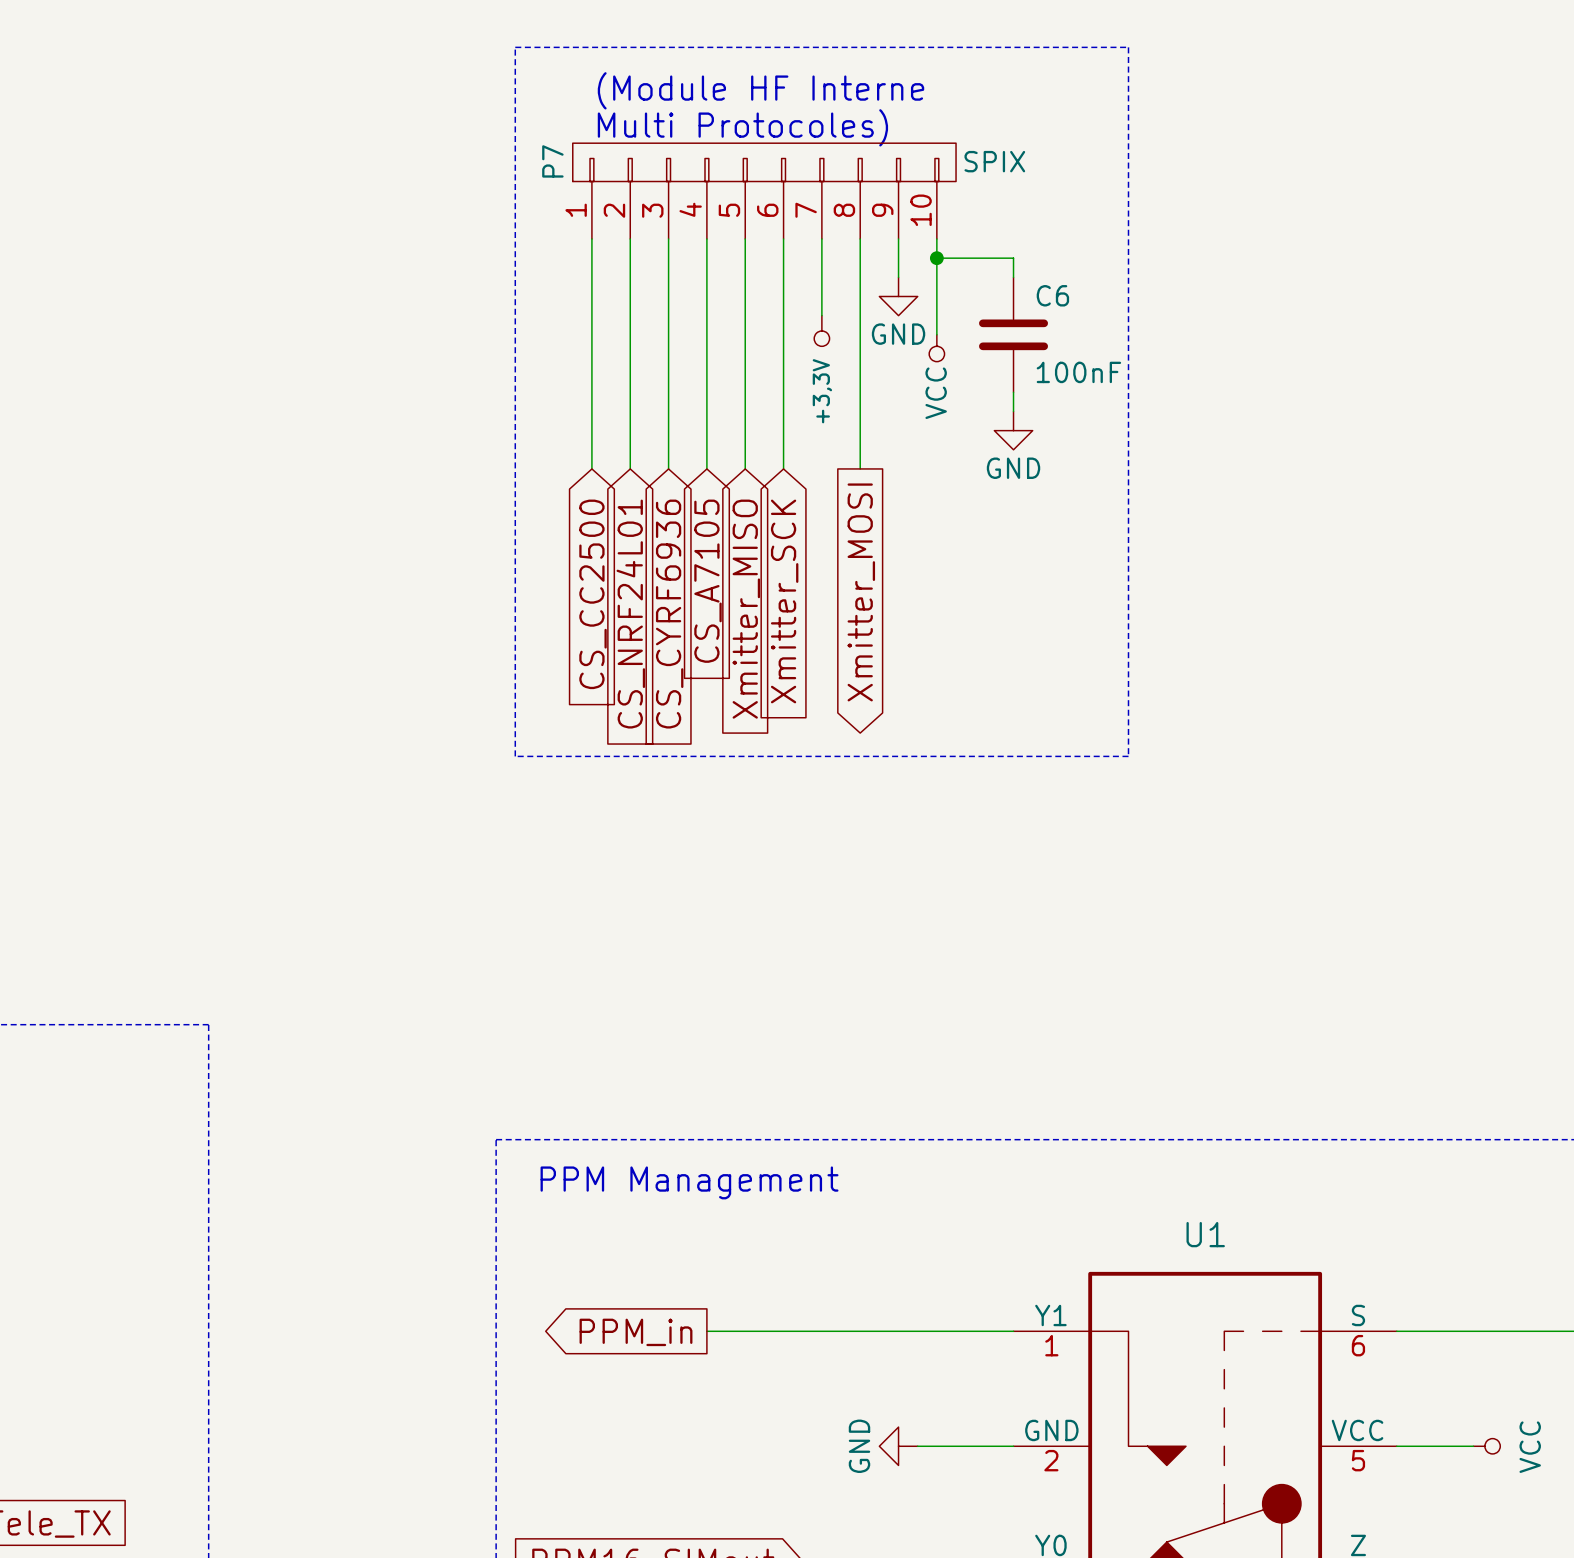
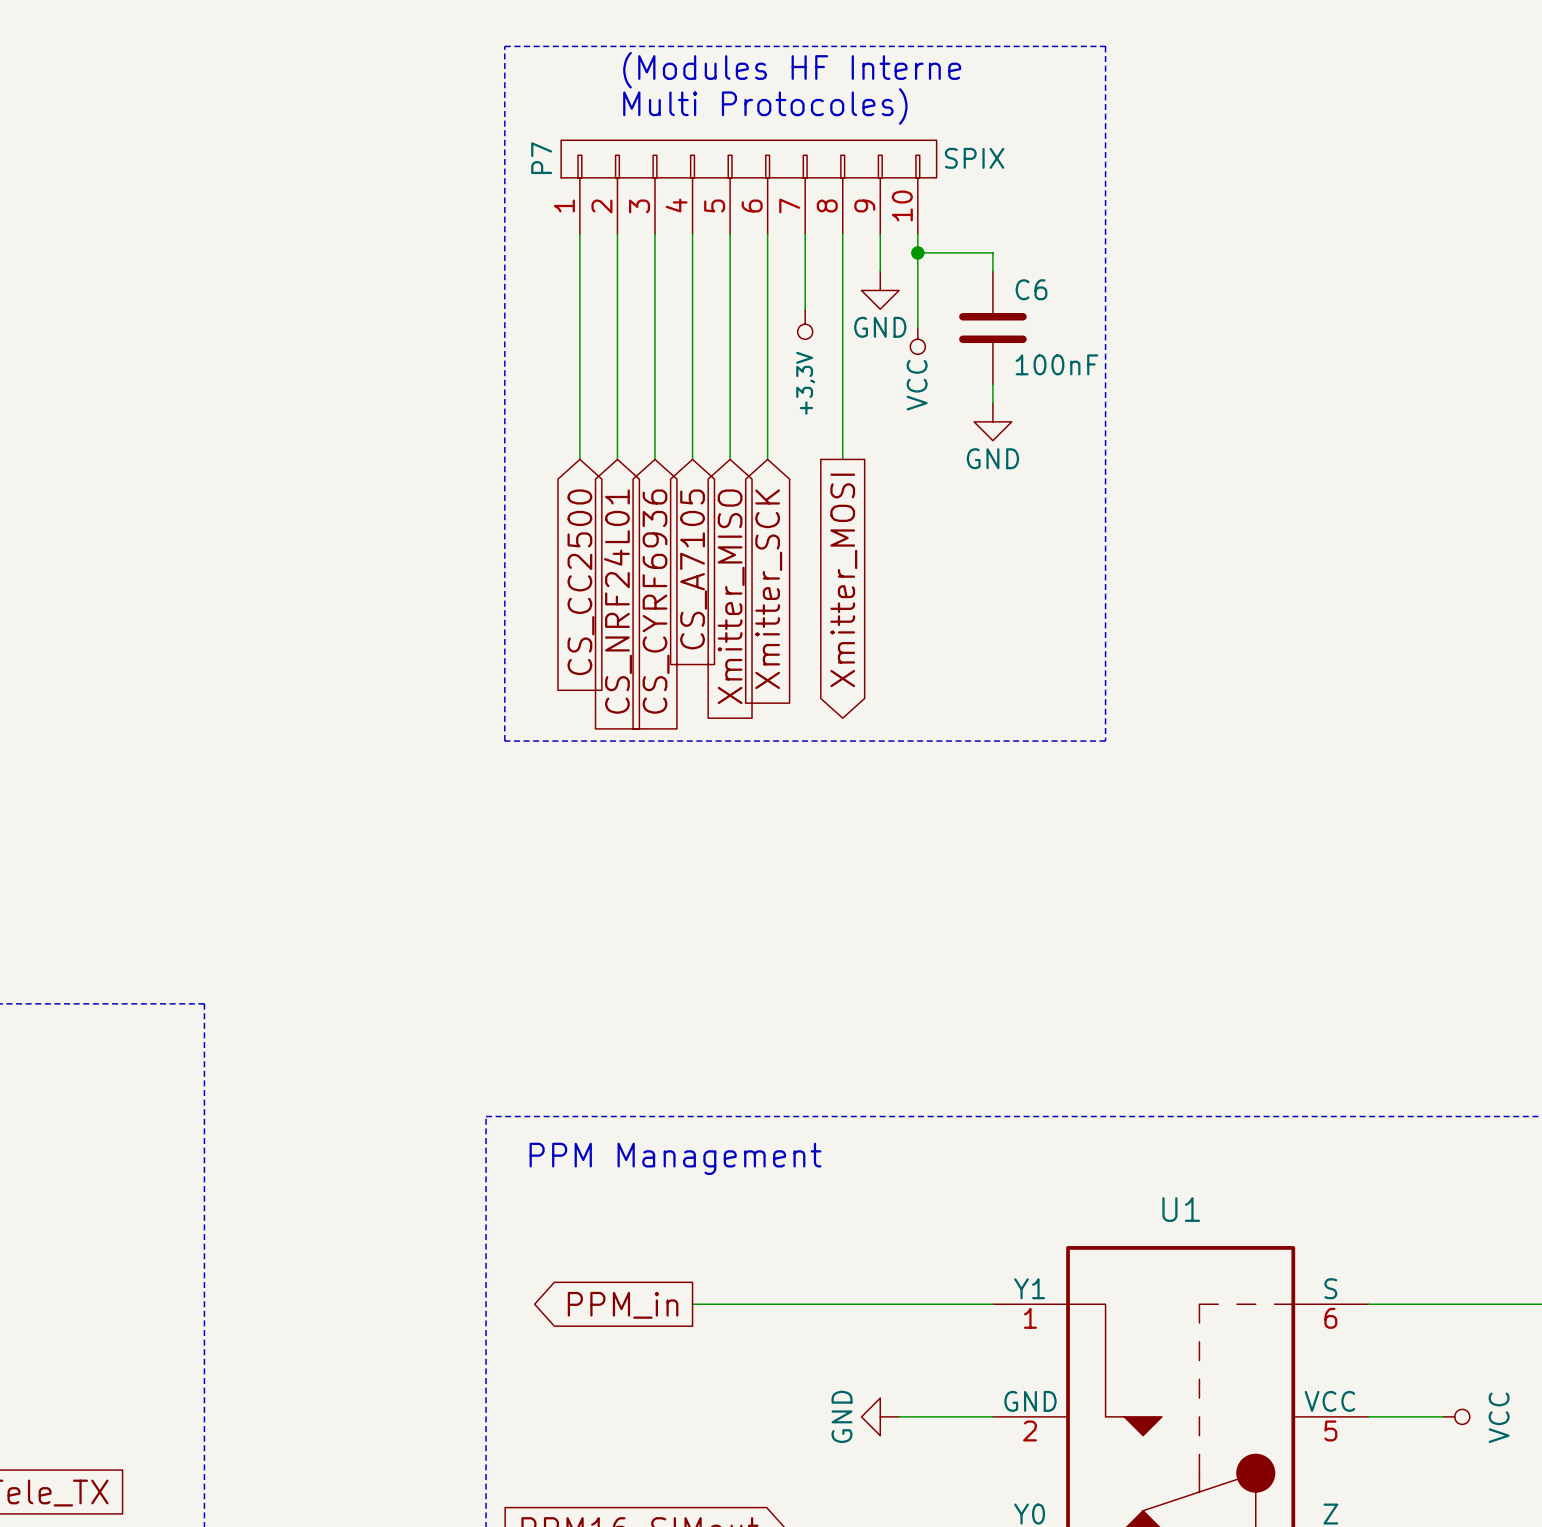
text: (Module HF Interne (760, 90) -> (Modules HF Interne (792, 70)
text position: Multi Protocoles) (742, 127) -> Multi Protocoles) (765, 106)

